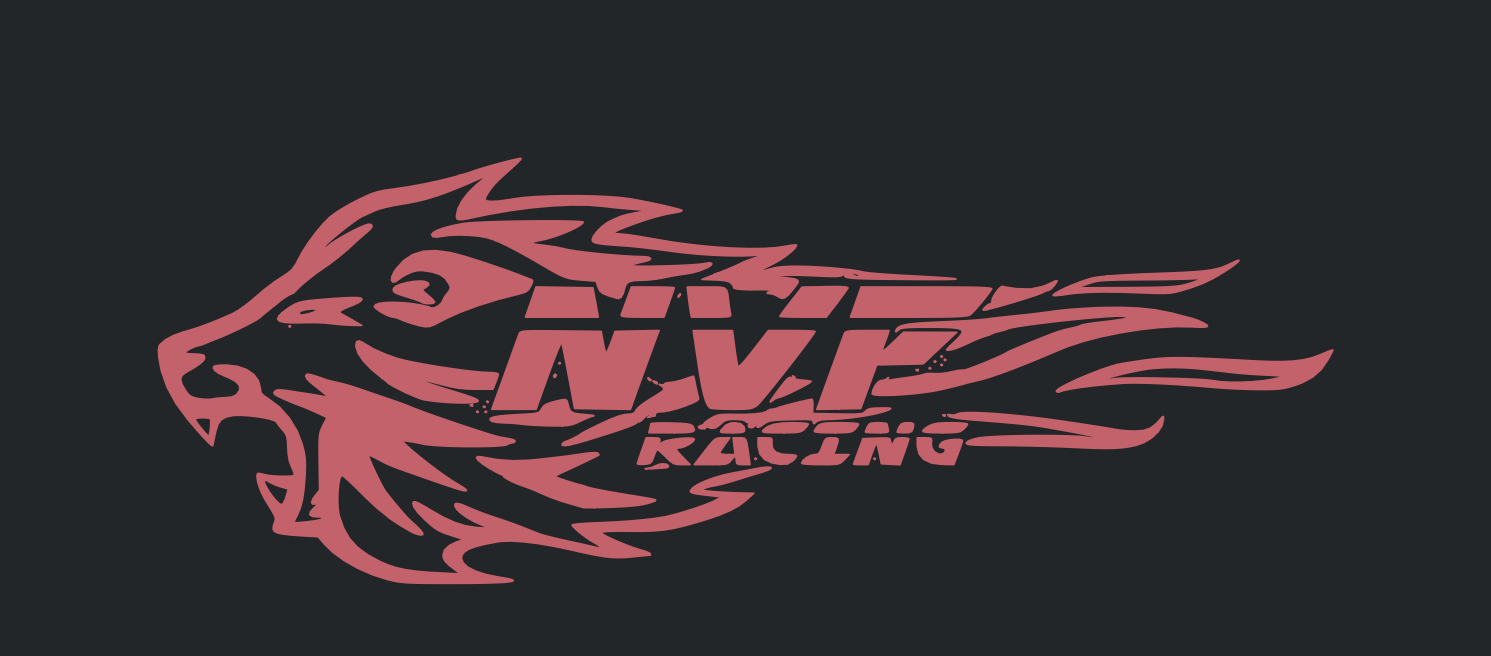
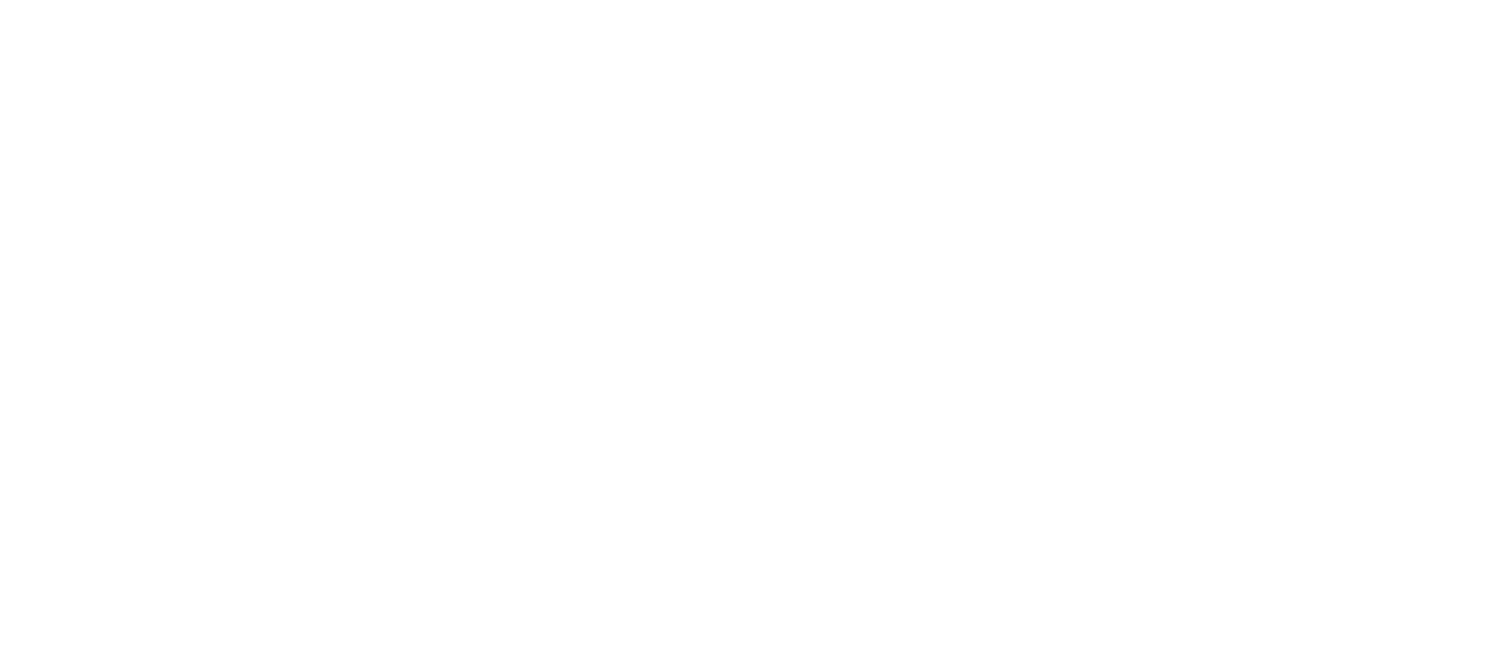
power symbol: (745, 370) -> none

